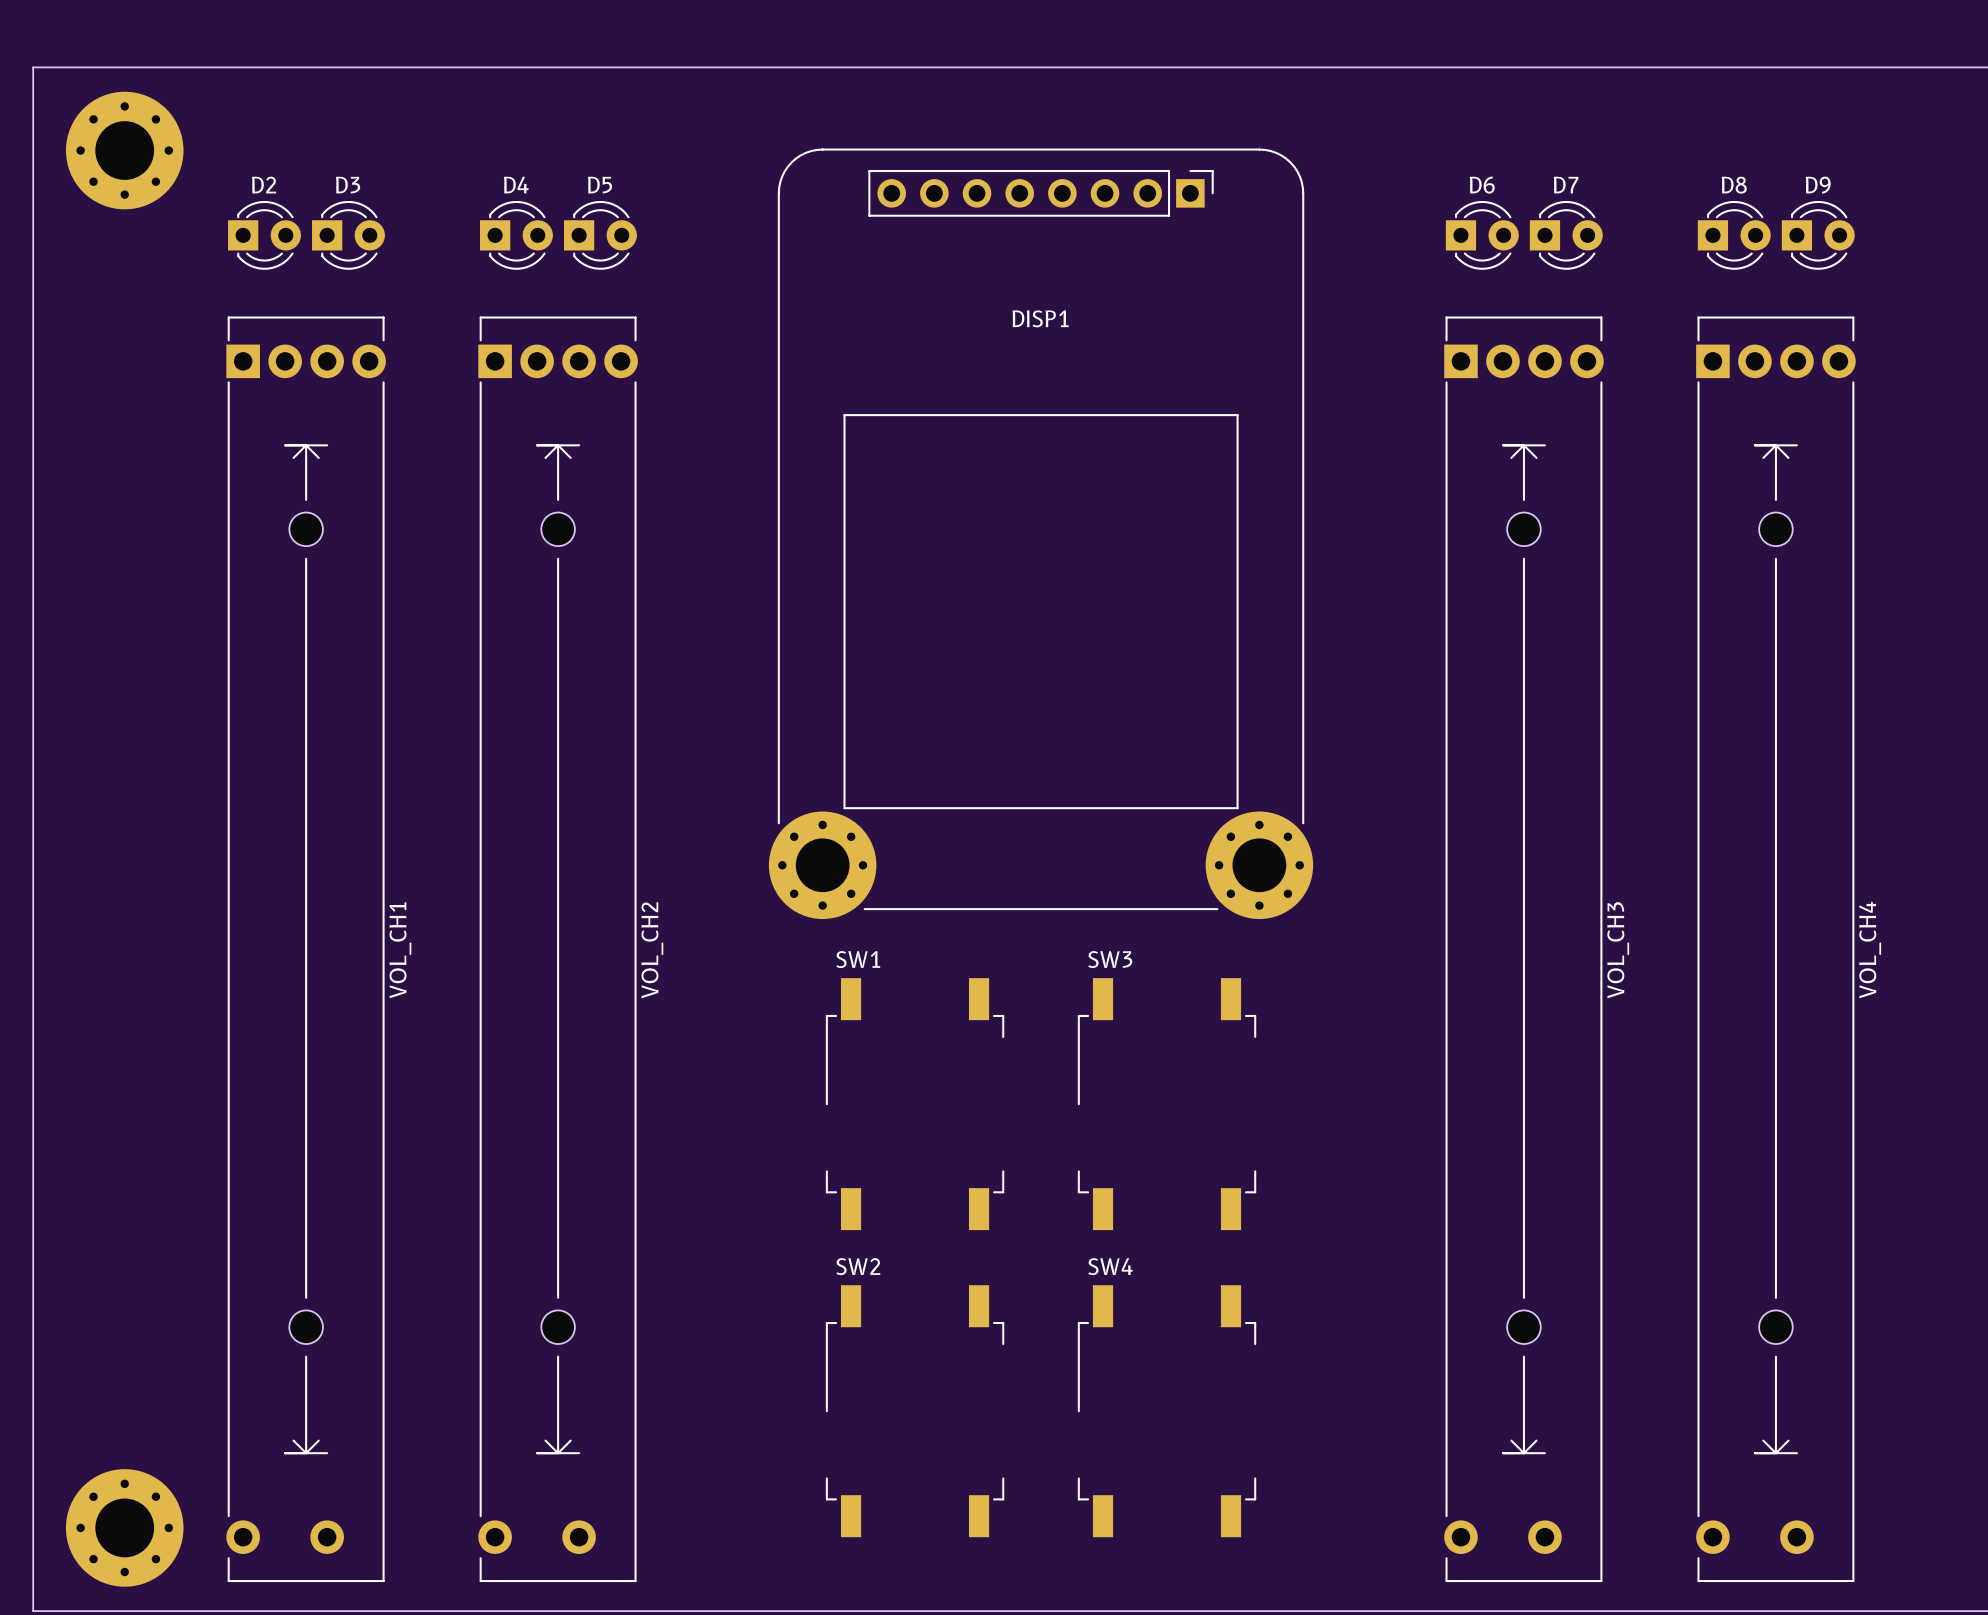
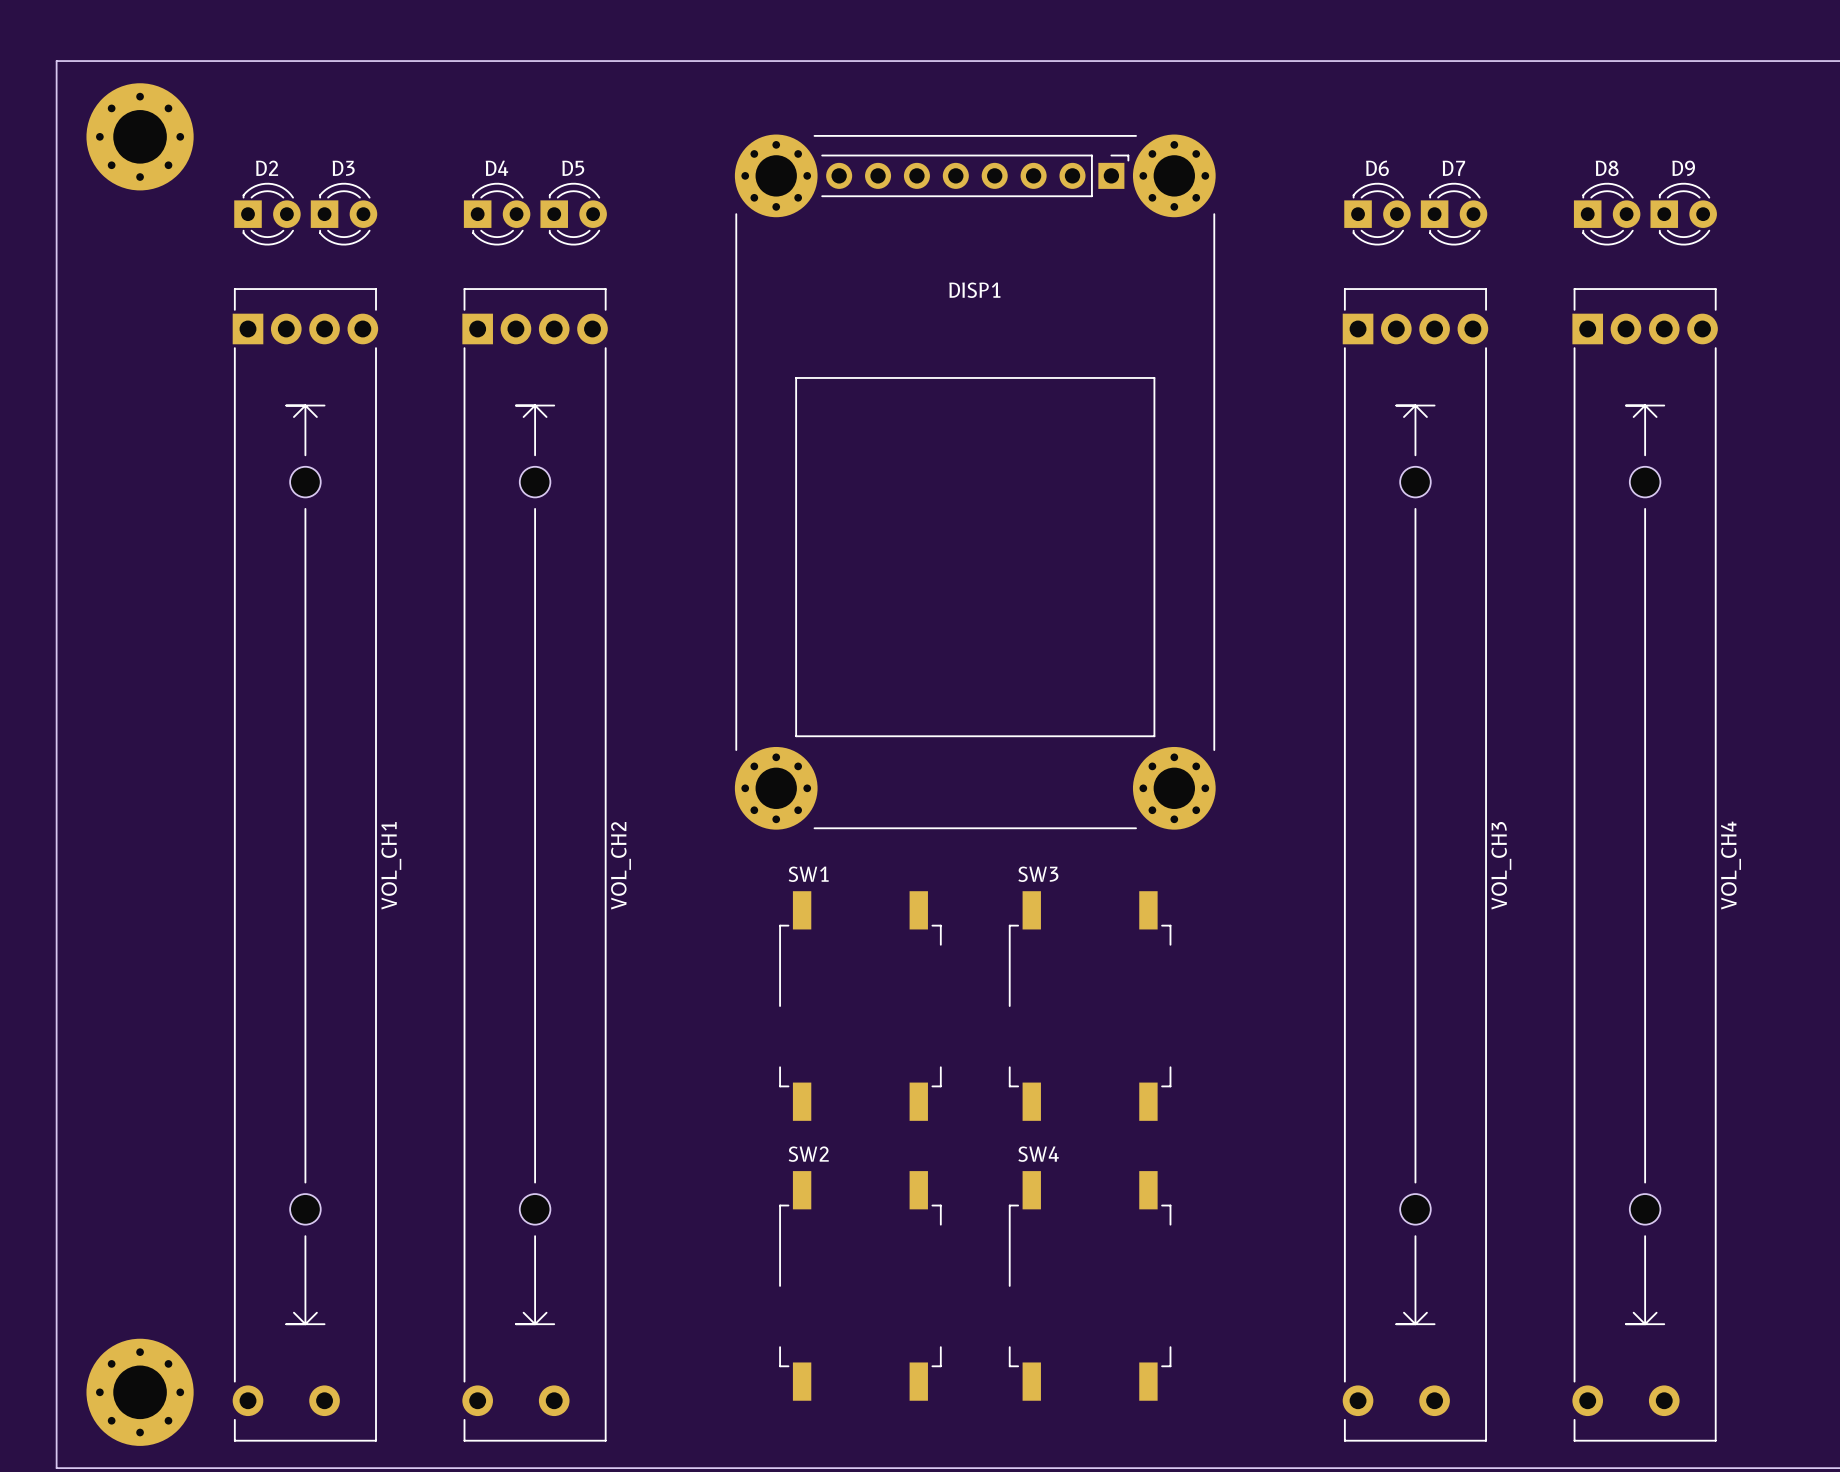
DISP1 footprint: [768, 148, 1314, 920] -> [734, 134, 1216, 830]

